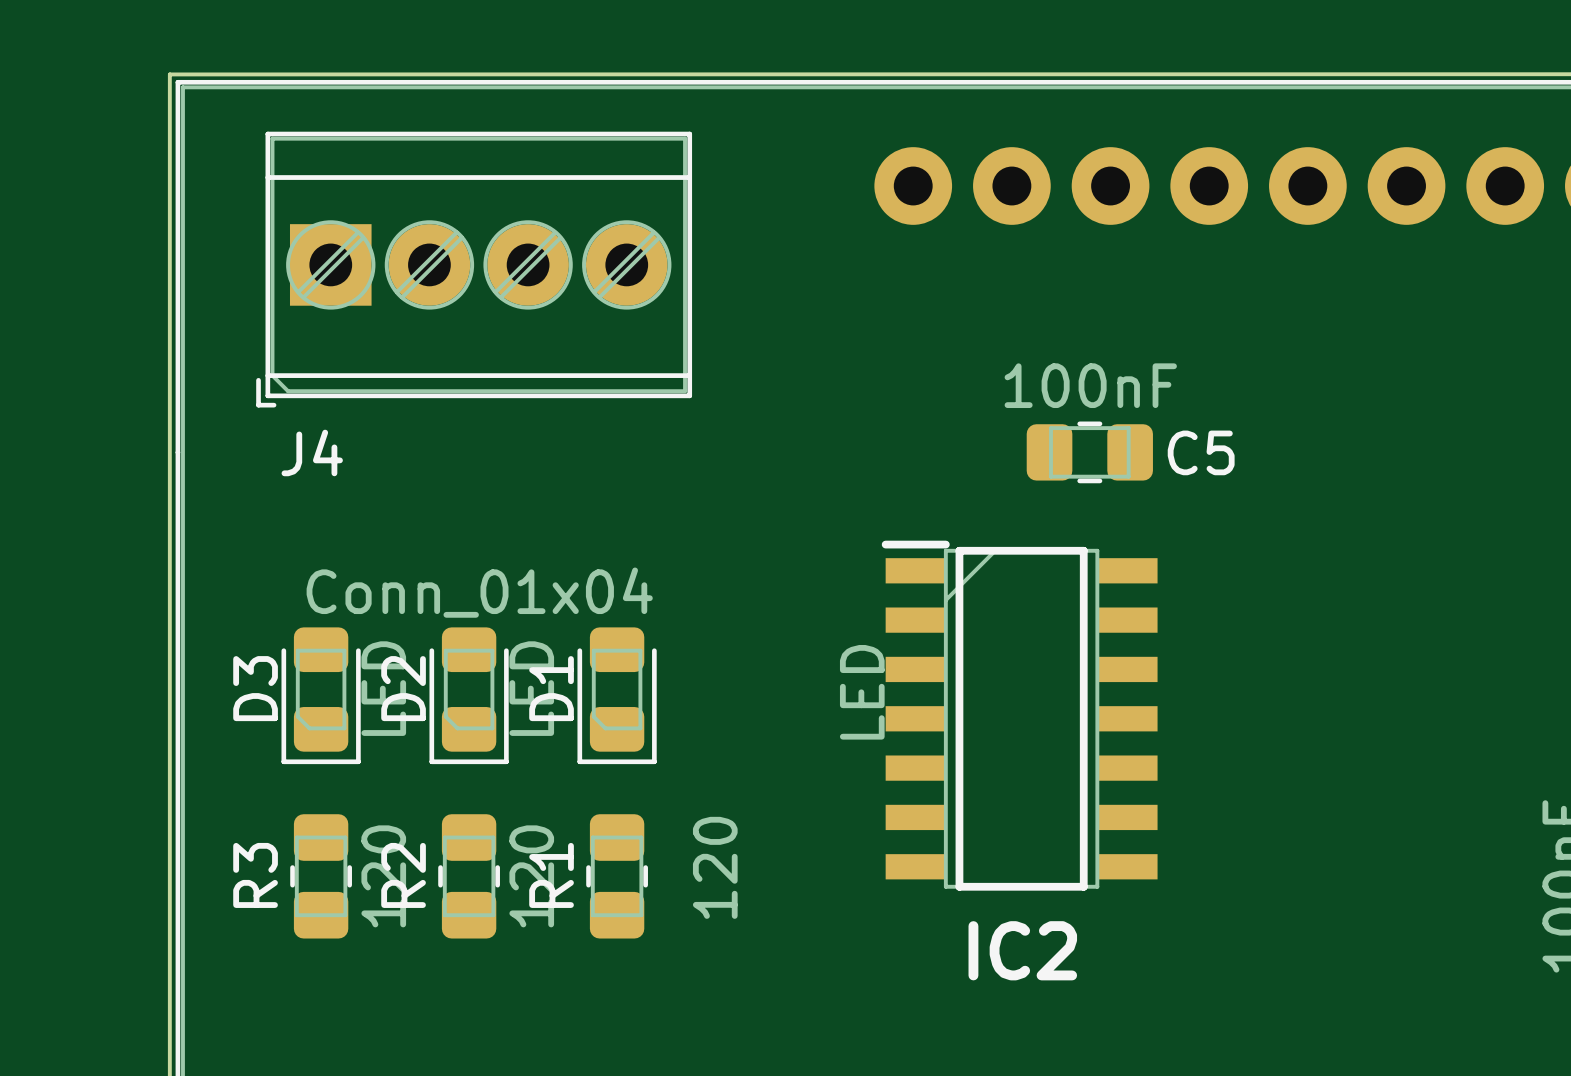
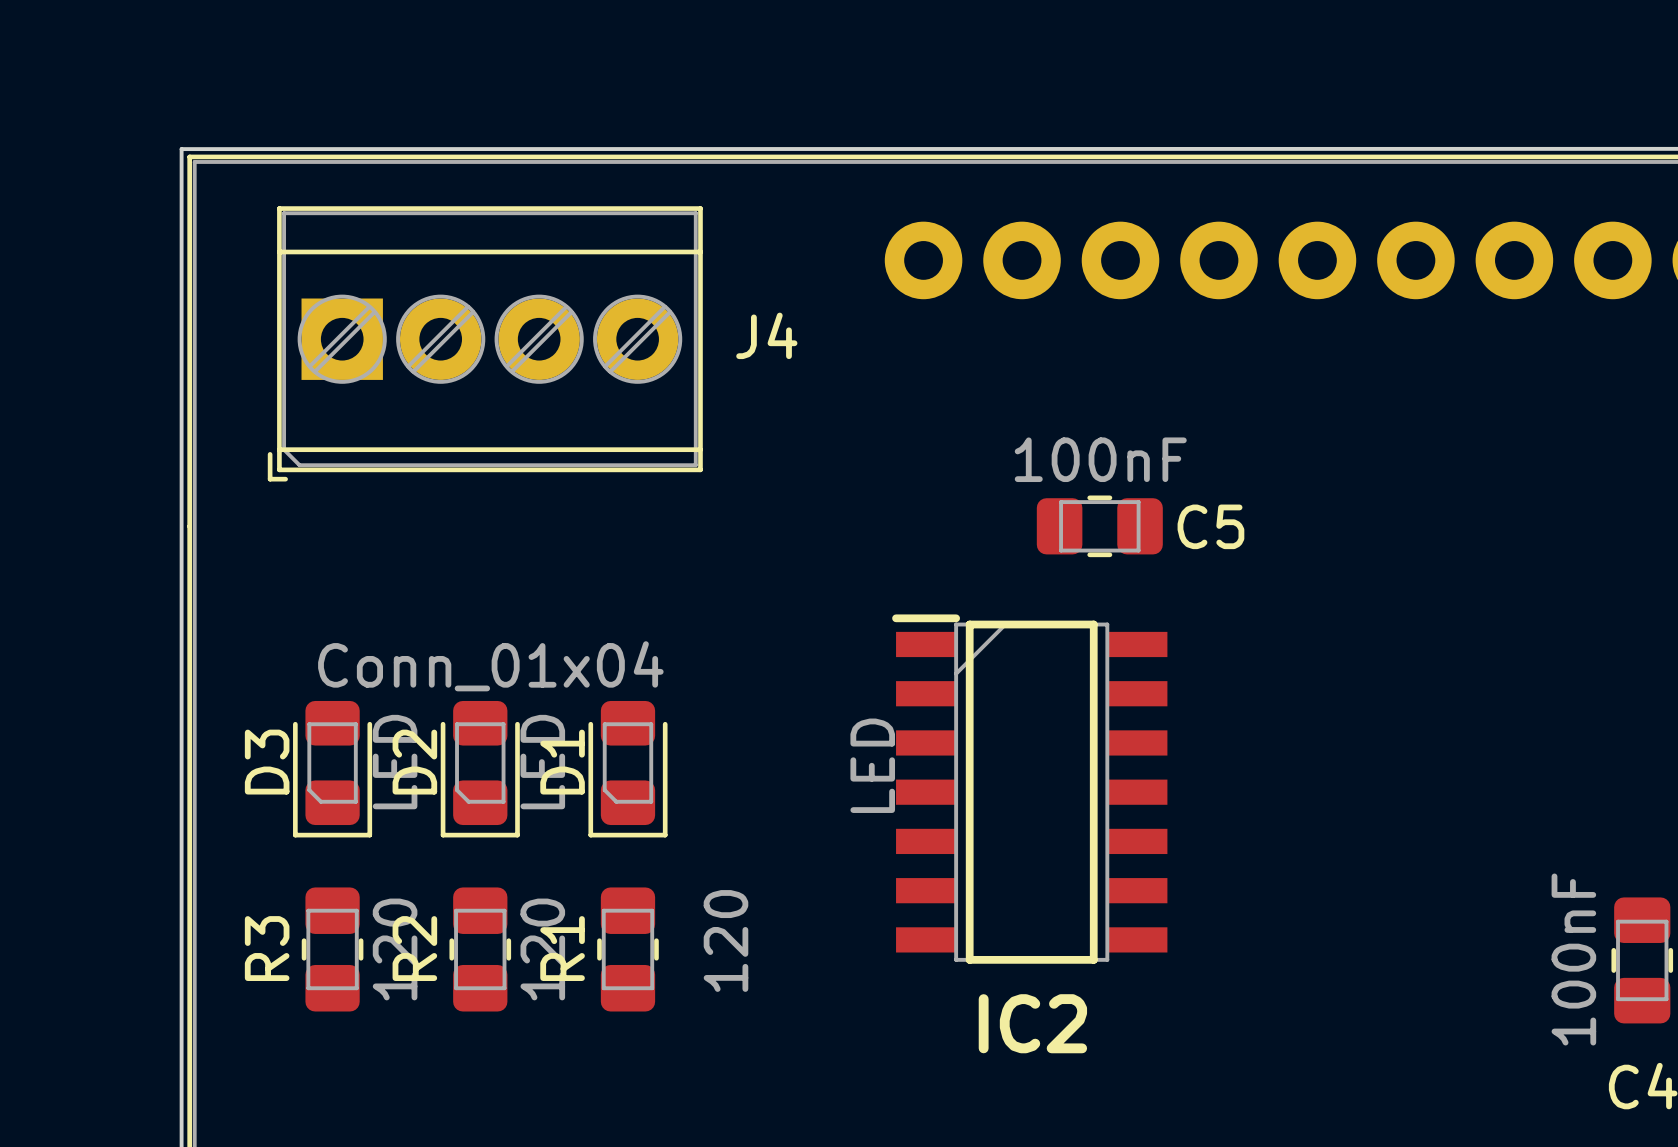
J4 name position: J4 (312, 452) -> J4 (766, 335)

